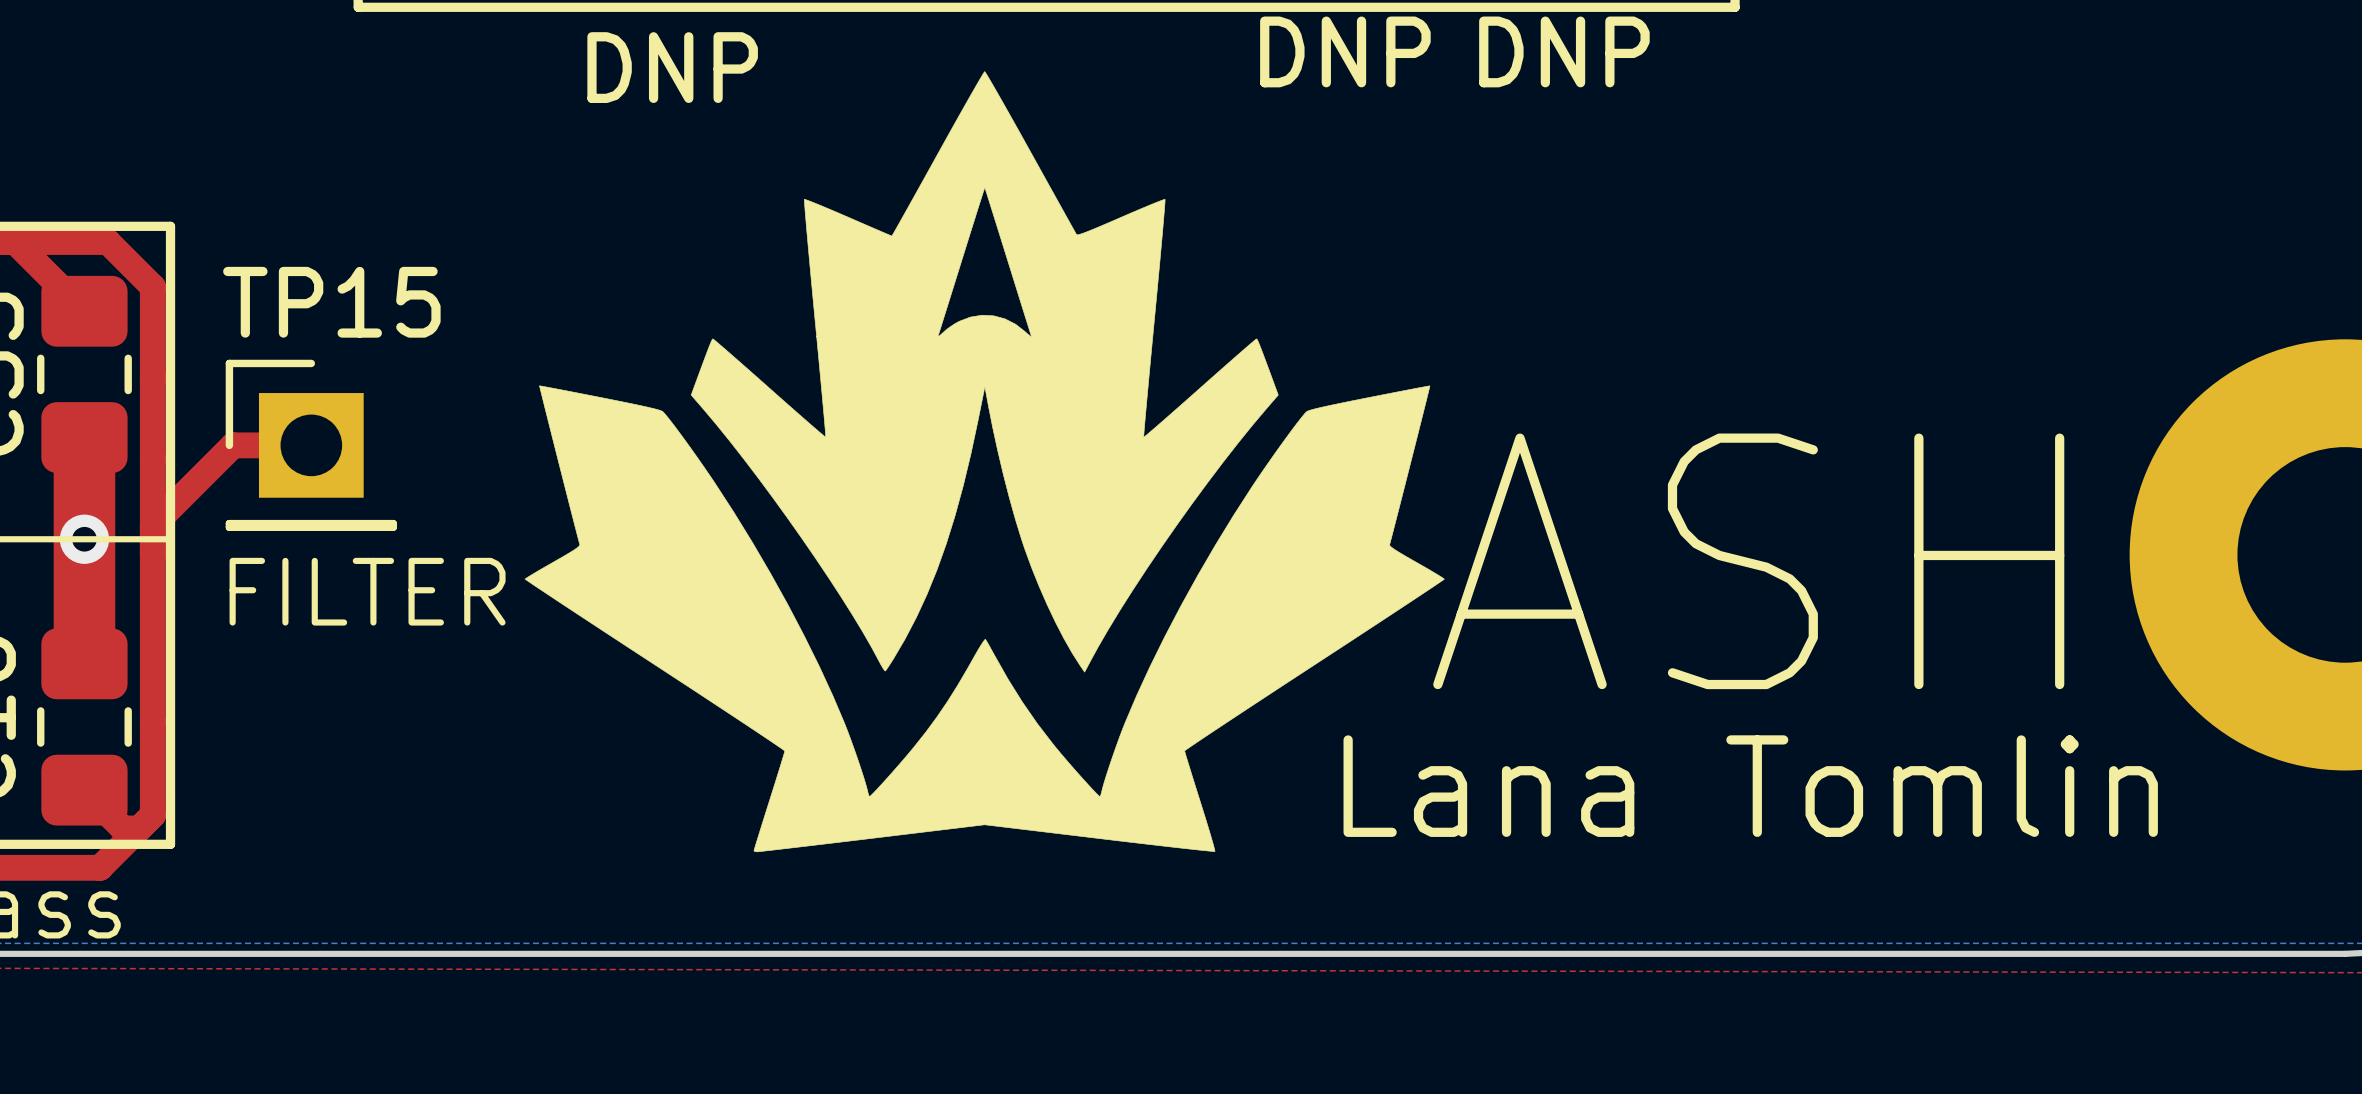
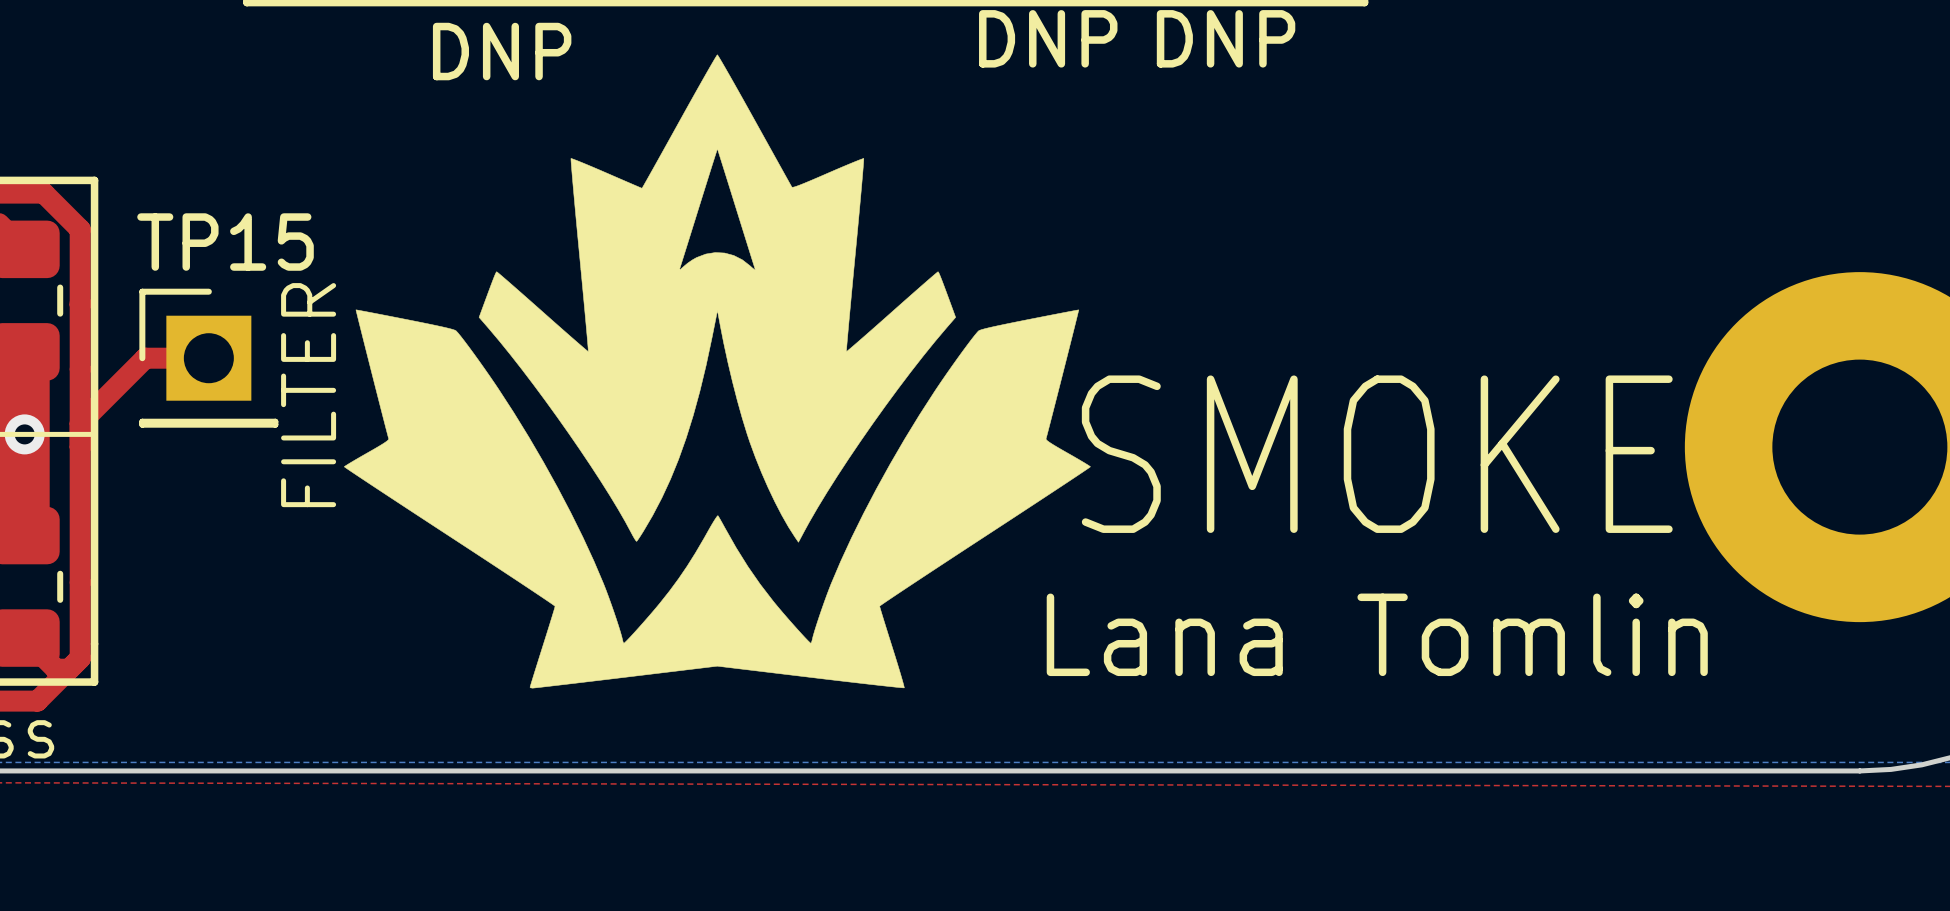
drawing position: (984, 461) -> (717, 371)
text: ASH (1748, 561) -> SMOKE (1377, 454)
TP15 value rotation: 0° (367, 591) -> 90° counterclockwise (308, 395)

